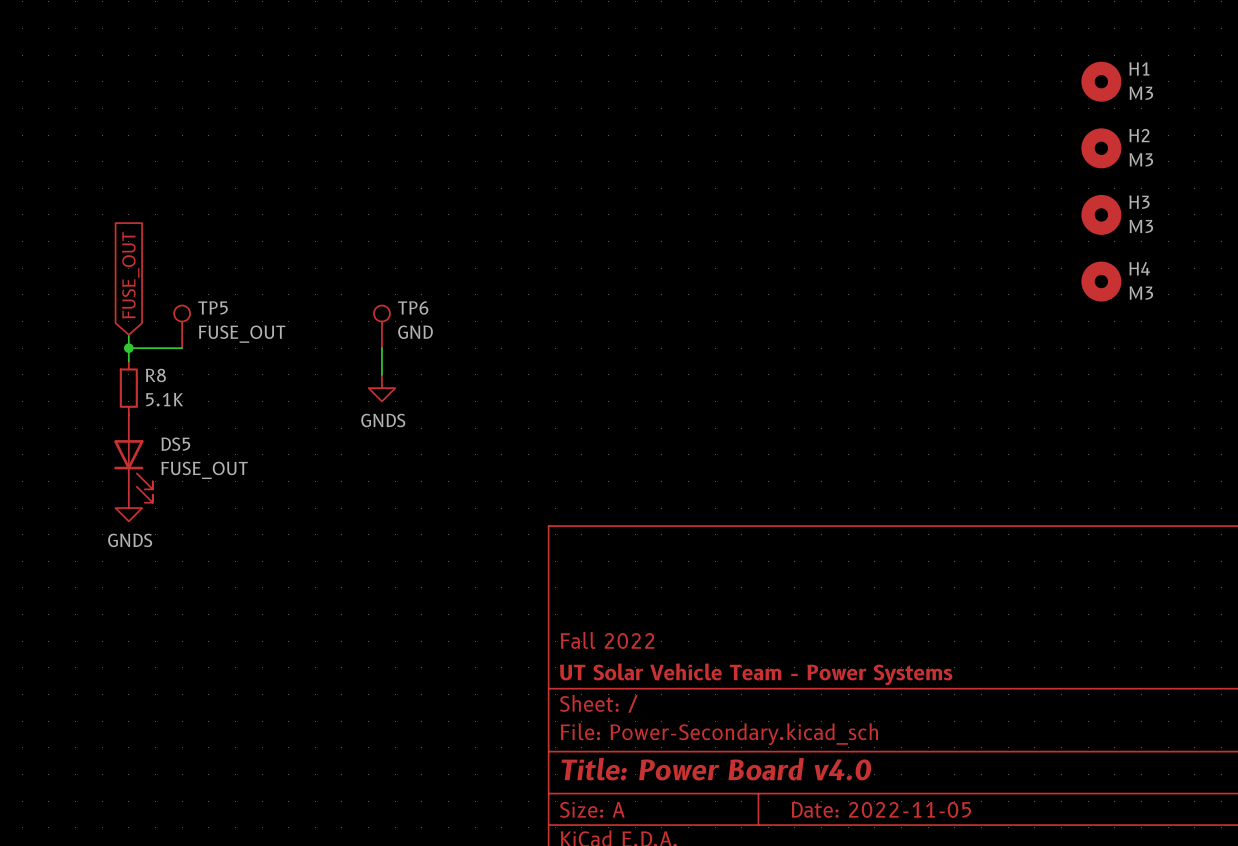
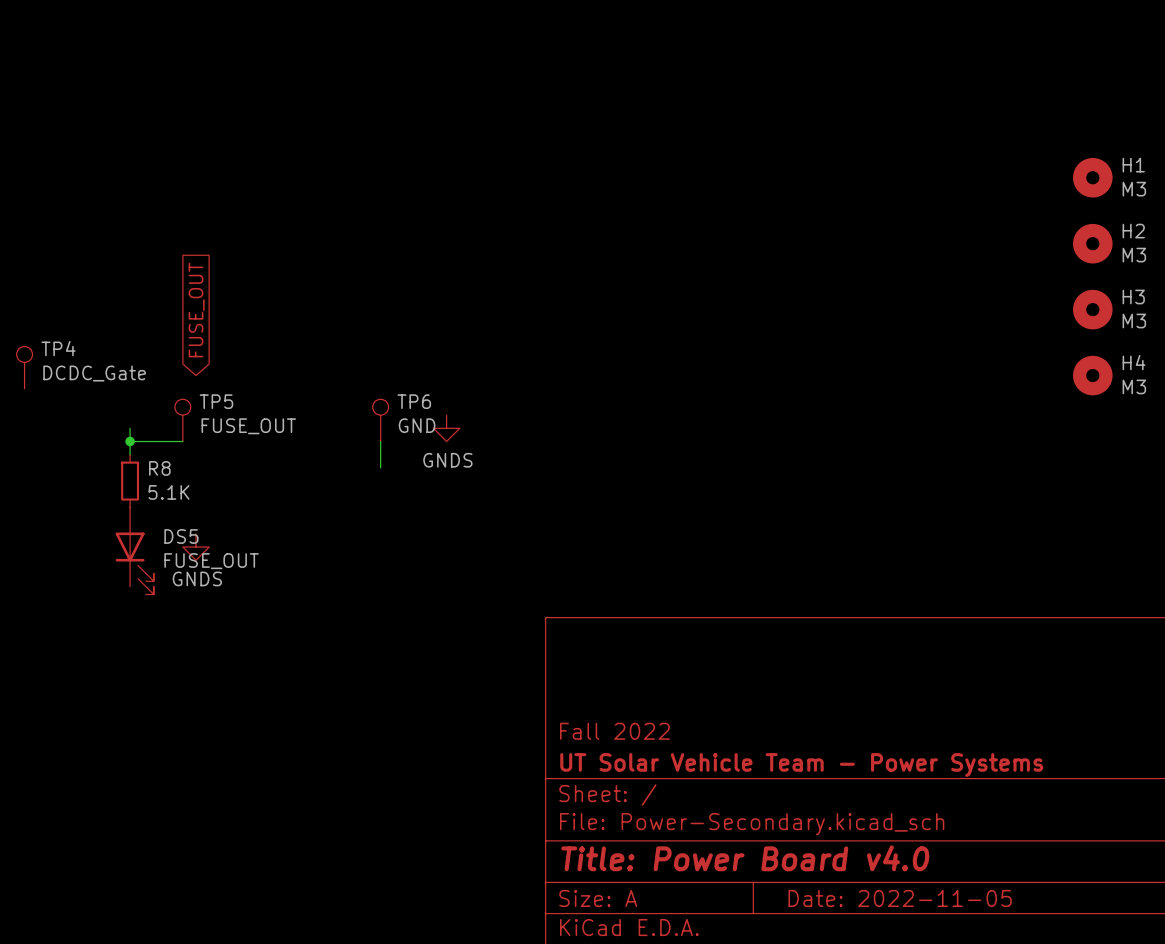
TP4: none -> DCDC_Gate (24, 367)
global label position: FUSE_OUT (130, 275) -> FUSE_OUT (196, 310)
power symbol position: GNDS (381, 388) -> GNDS (446, 428)
power symbol position: GNDS (128, 508) -> GNDS (196, 547)

